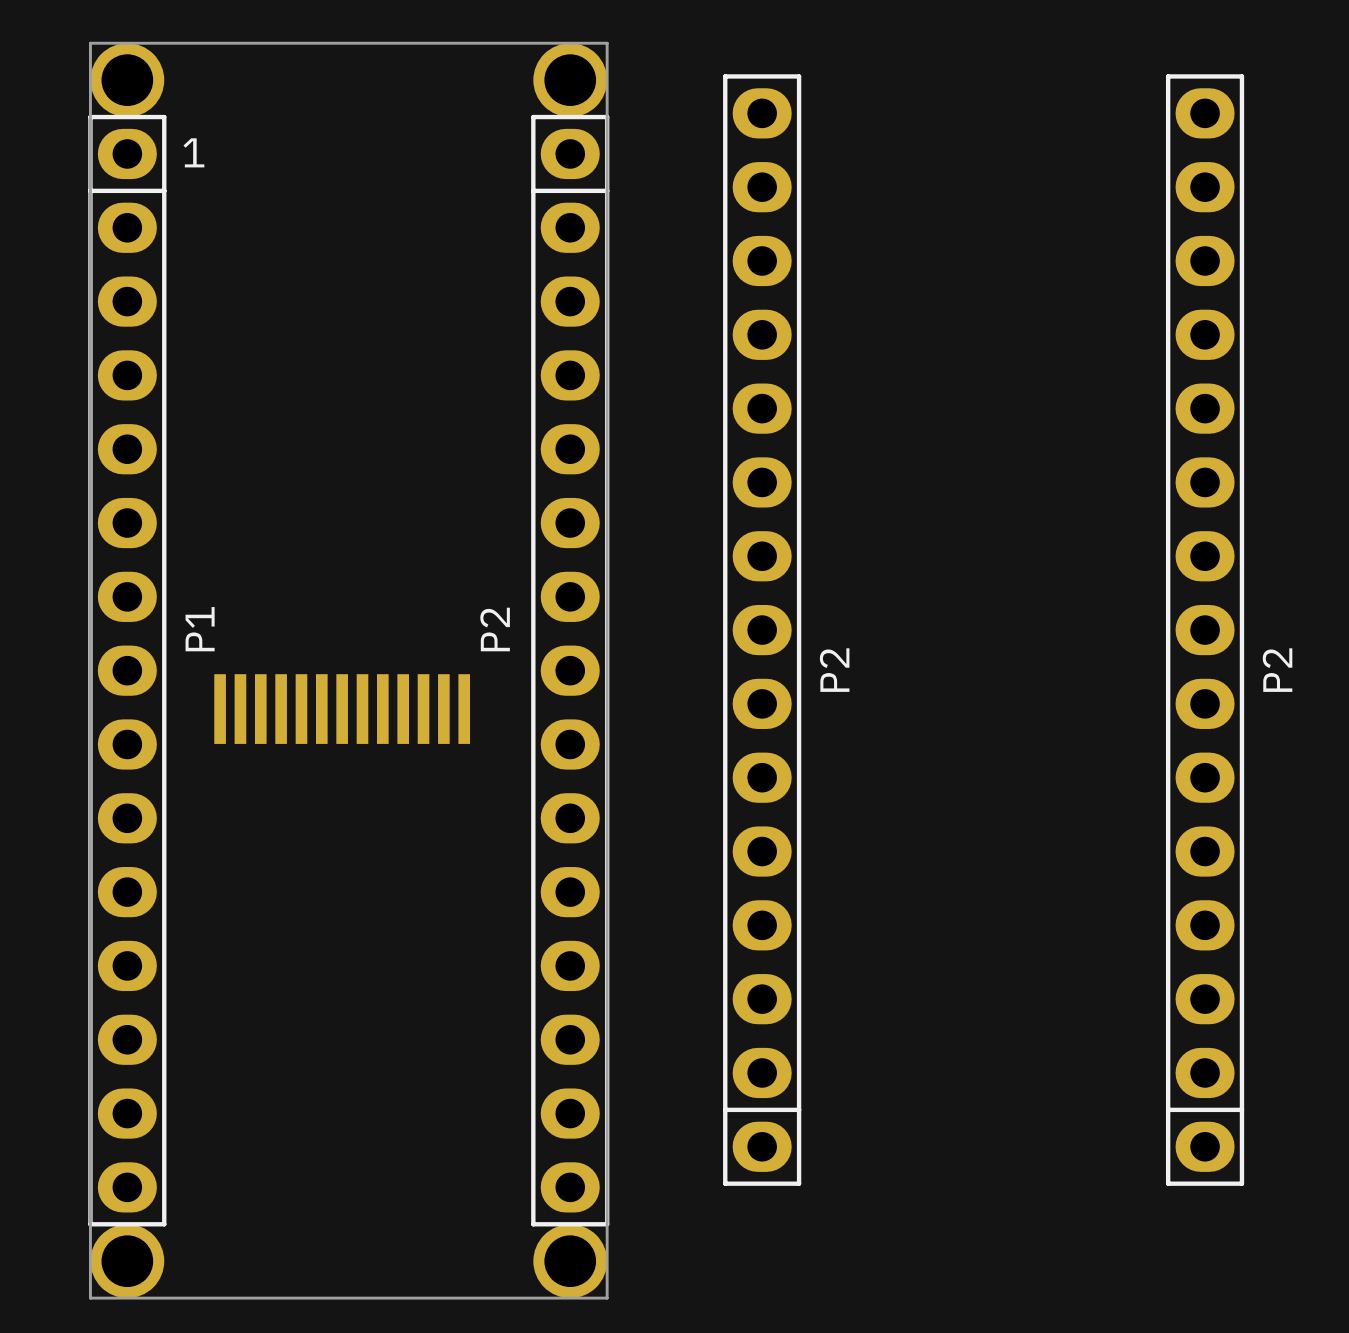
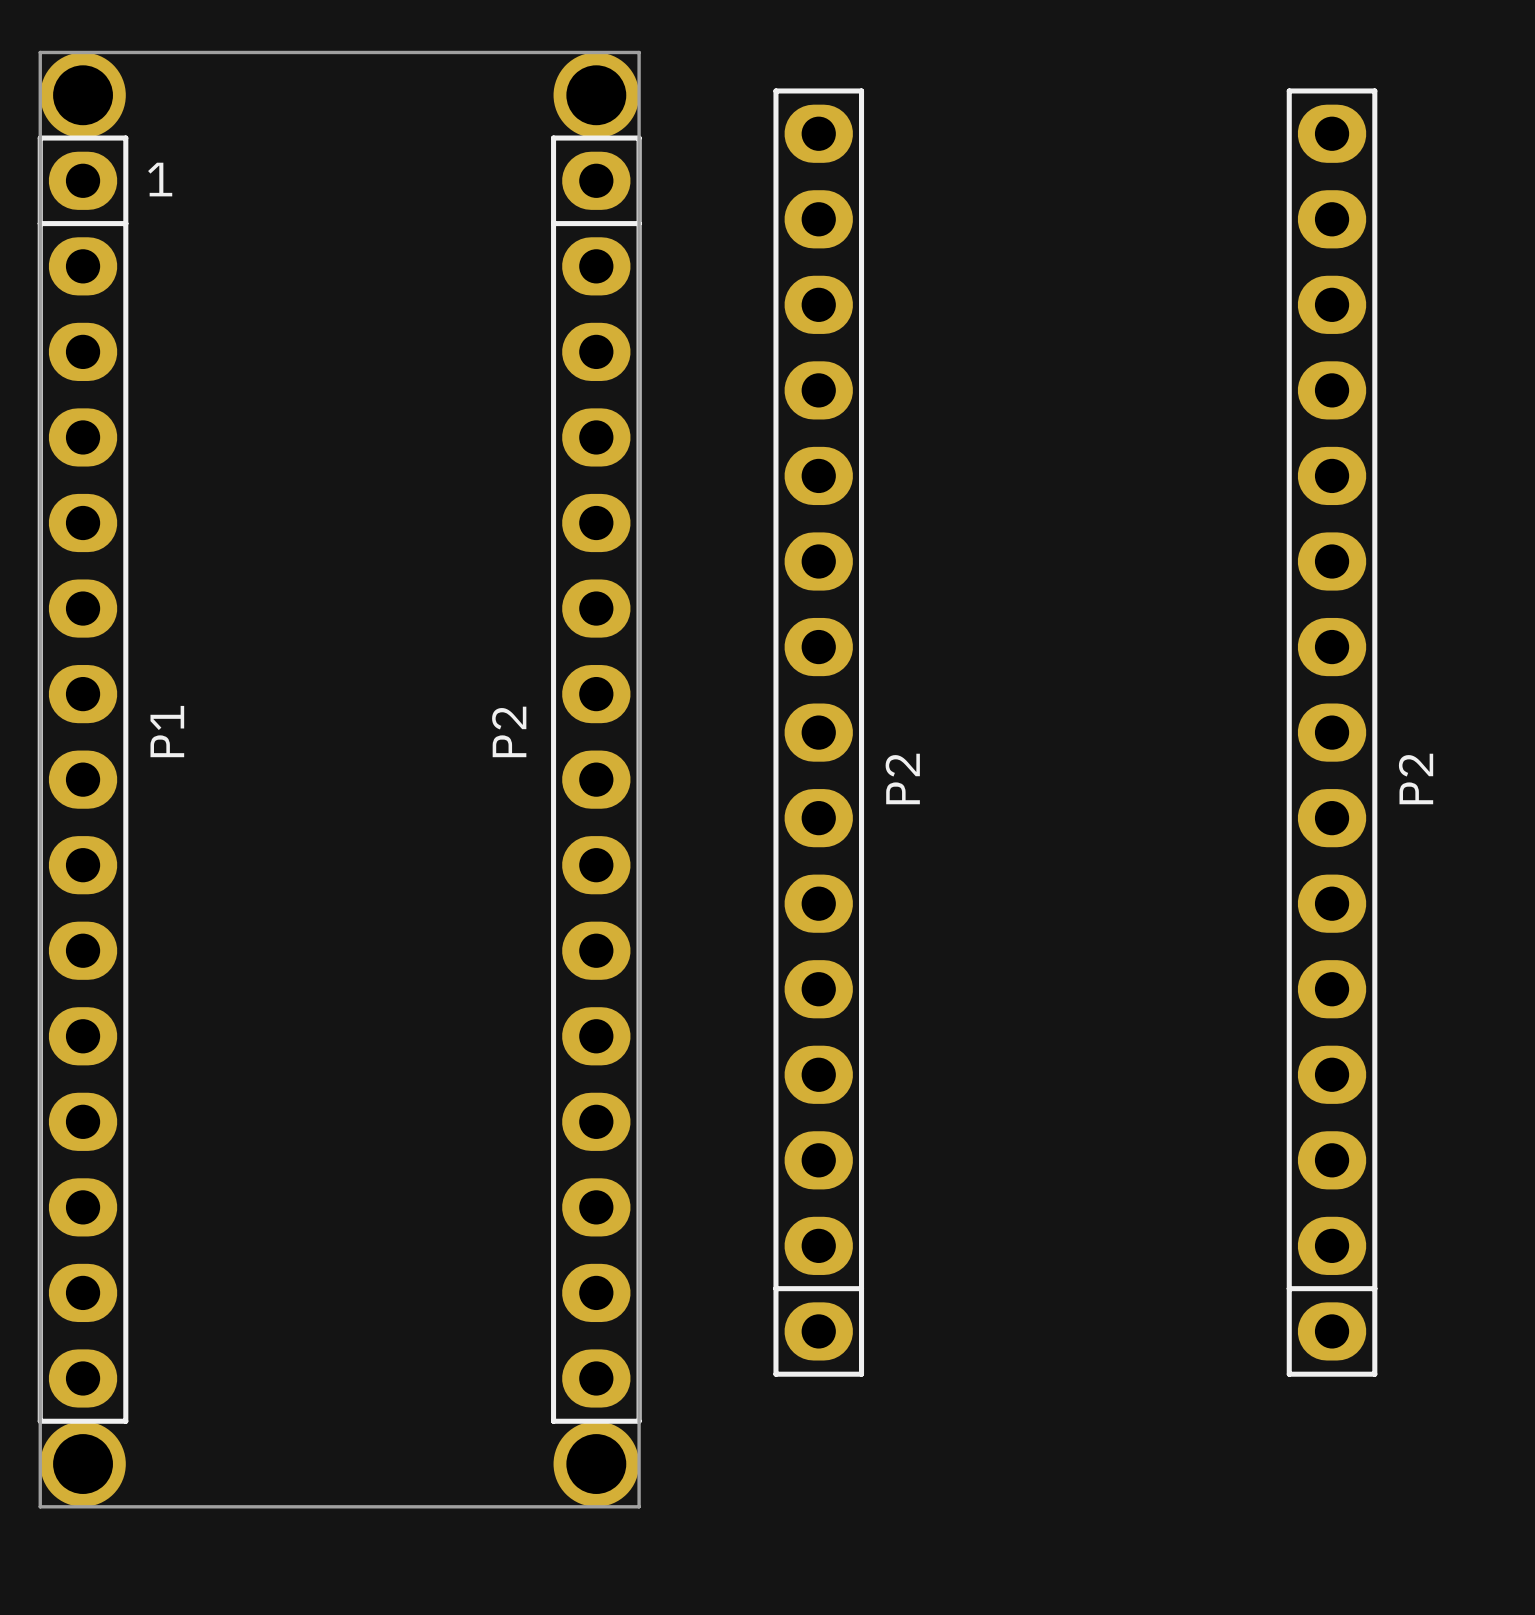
part: (342, 709) -> none

